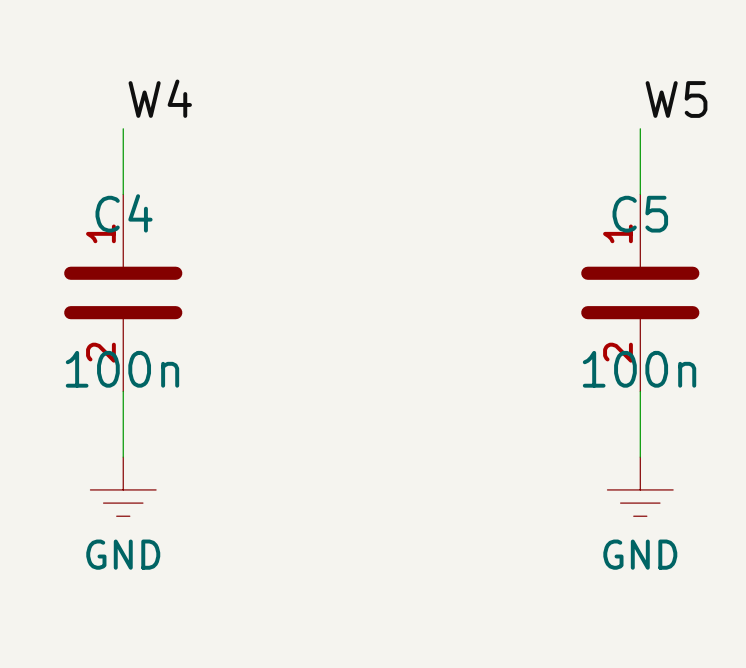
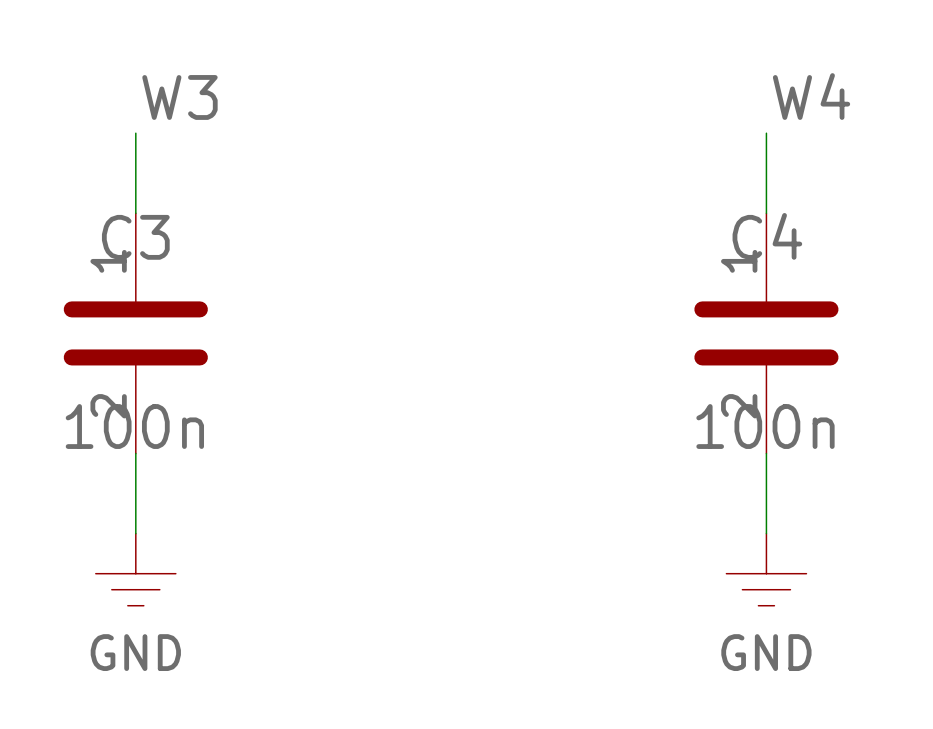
label: W4 (160, 98) -> W3 (179, 97)
label: W5 (676, 99) -> W4 (811, 96)
C4 name: C4 (124, 213) -> C3 (135, 237)
C5 name: C5 (640, 214) -> C4 (767, 236)

